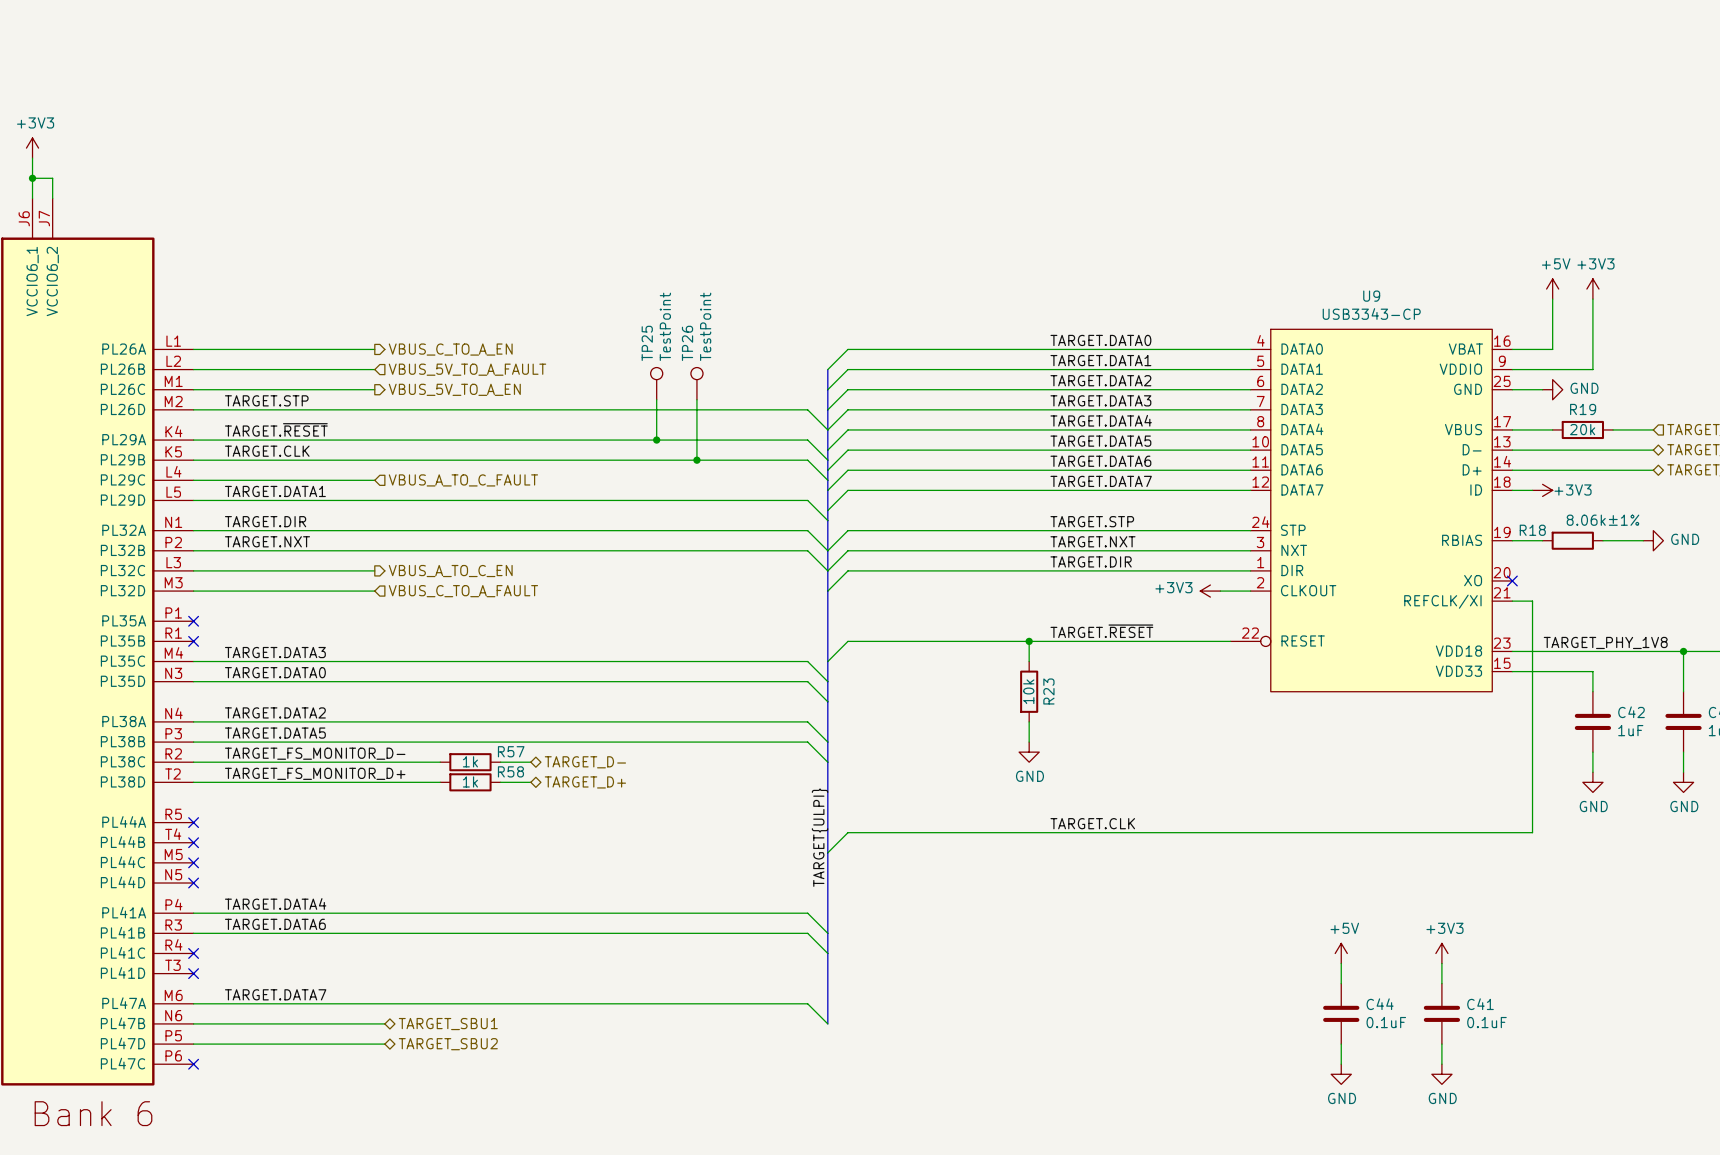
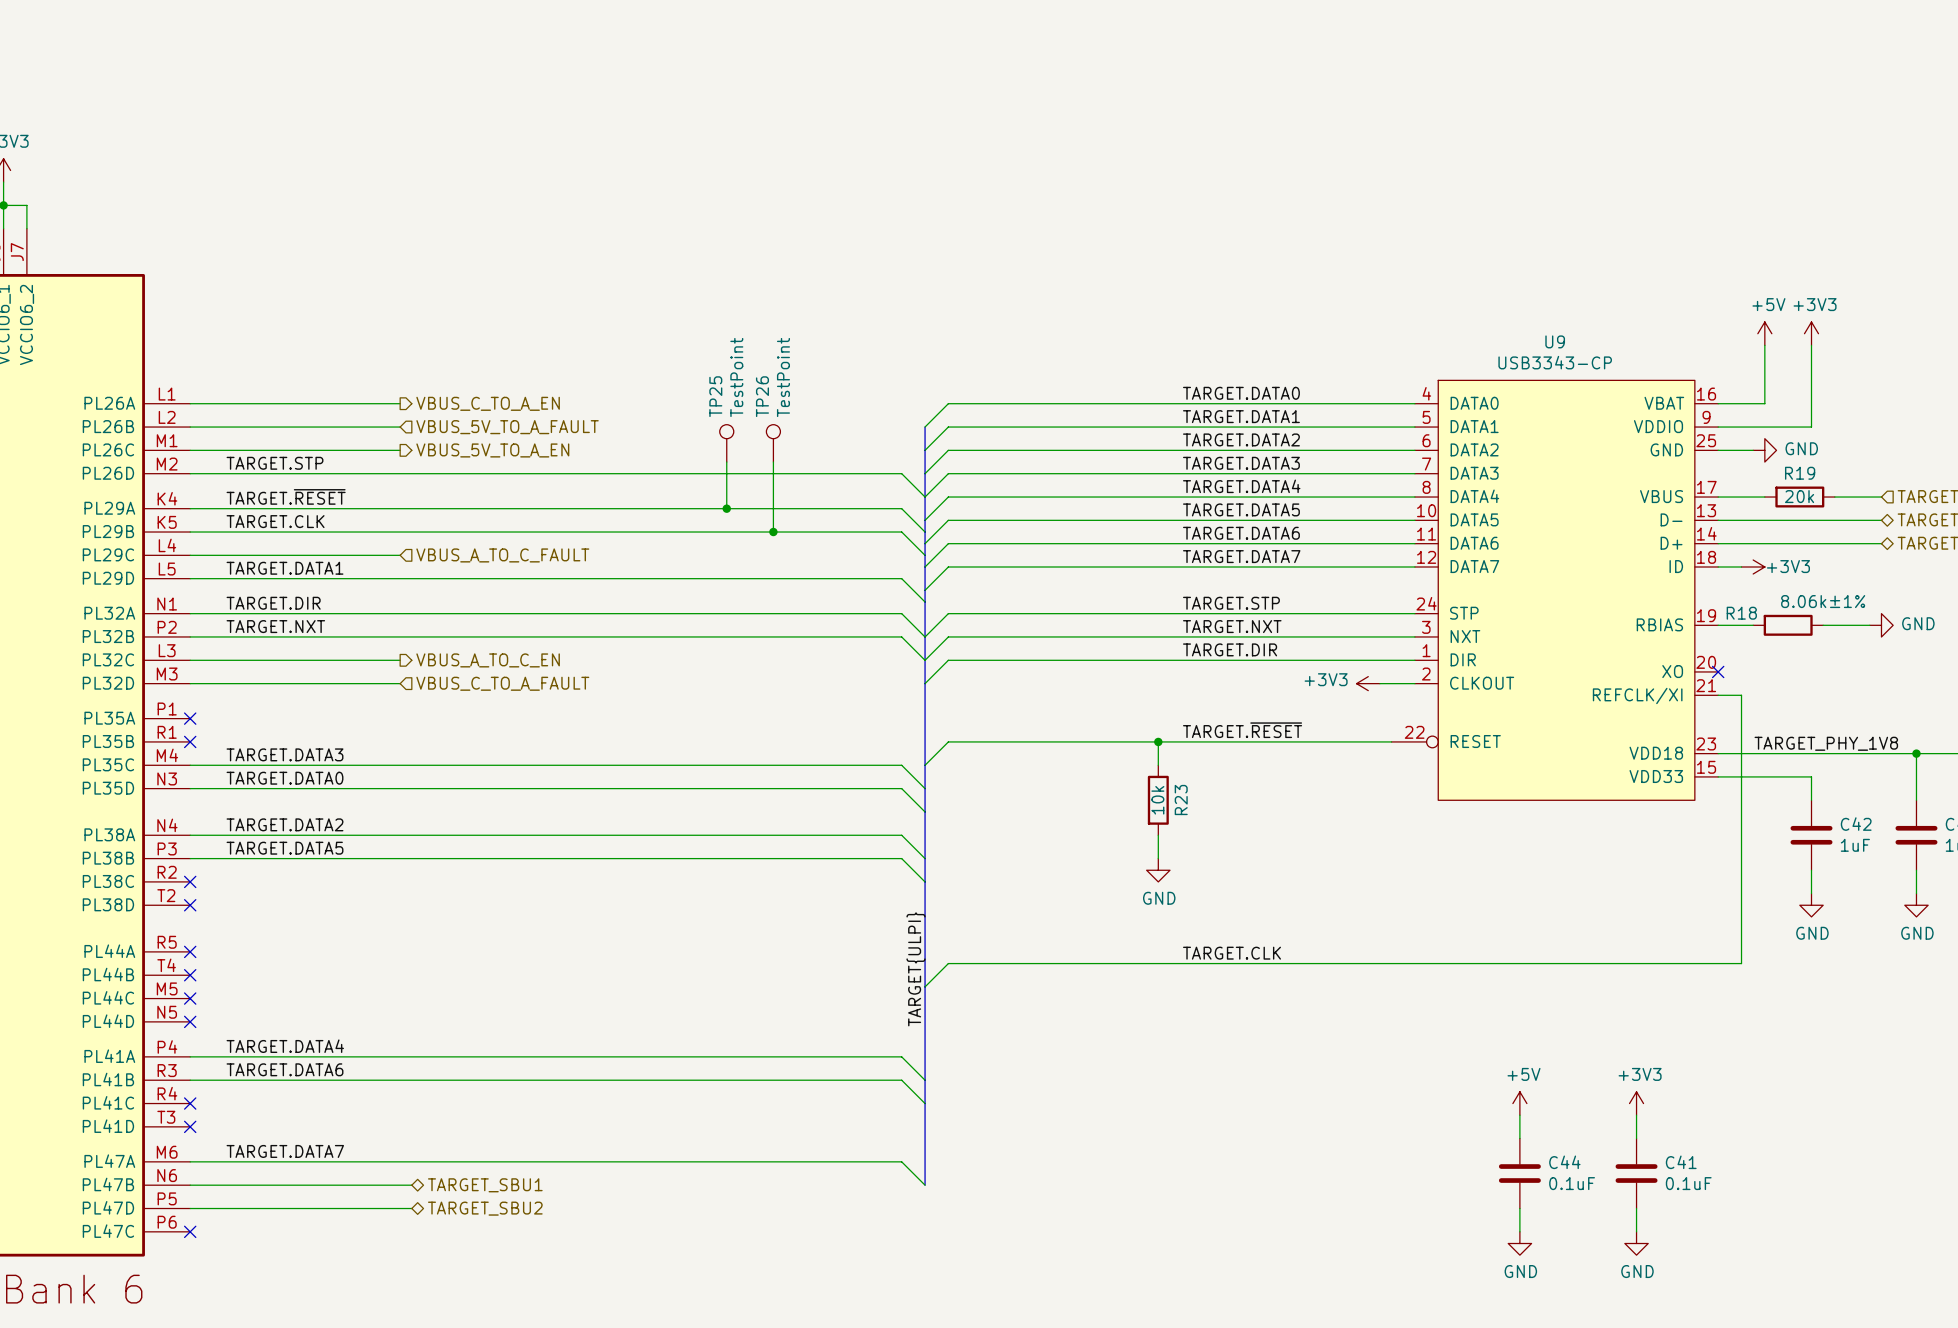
label: TARGET_FS_MONITOR_D- (315, 753) -> none
wire: (193, 762) (440, 762) -> none
no-connect mark: none -> (190, 881)
R57: 1k (470, 762) -> none
wire: (500, 762) (530, 762) -> none
hierarchical label: TARGET_D- (585, 762) -> none
label: TARGET_FS_MONITOR_D+ (315, 773) -> none
wire: (193, 782) (440, 782) -> none
no-connect mark: none -> (190, 905)
R58: 1k (470, 782) -> none
wire: (500, 782) (530, 782) -> none
hierarchical label: TARGET_D+ (585, 782) -> none

